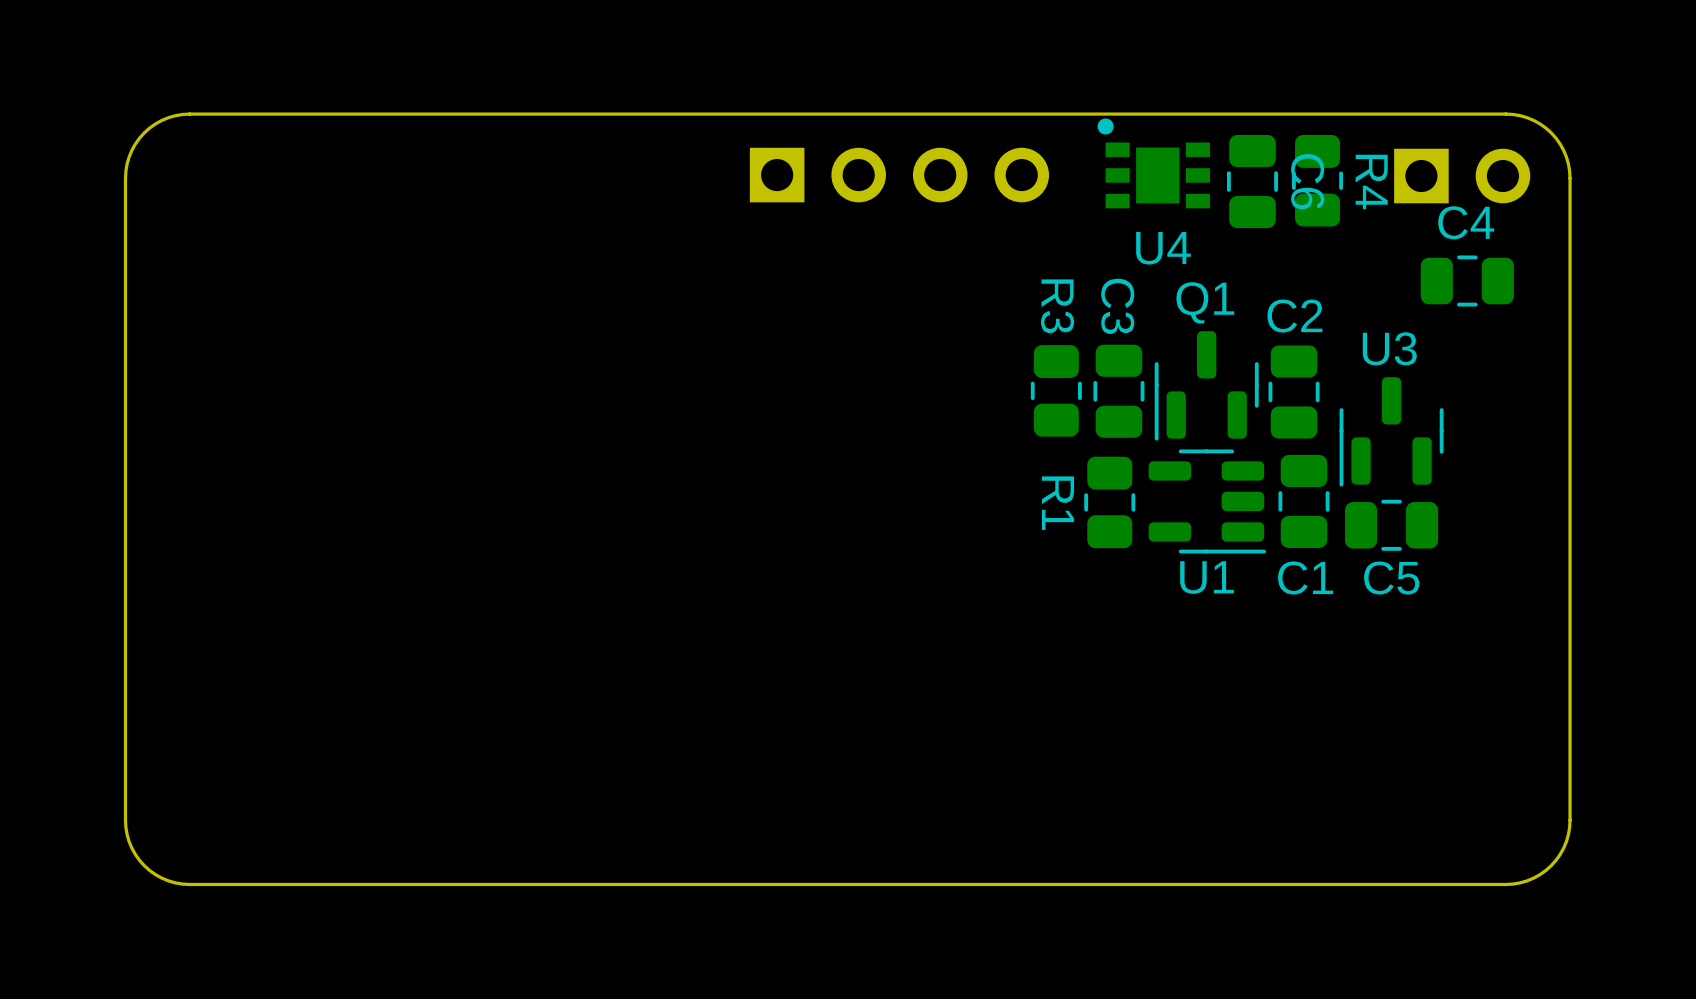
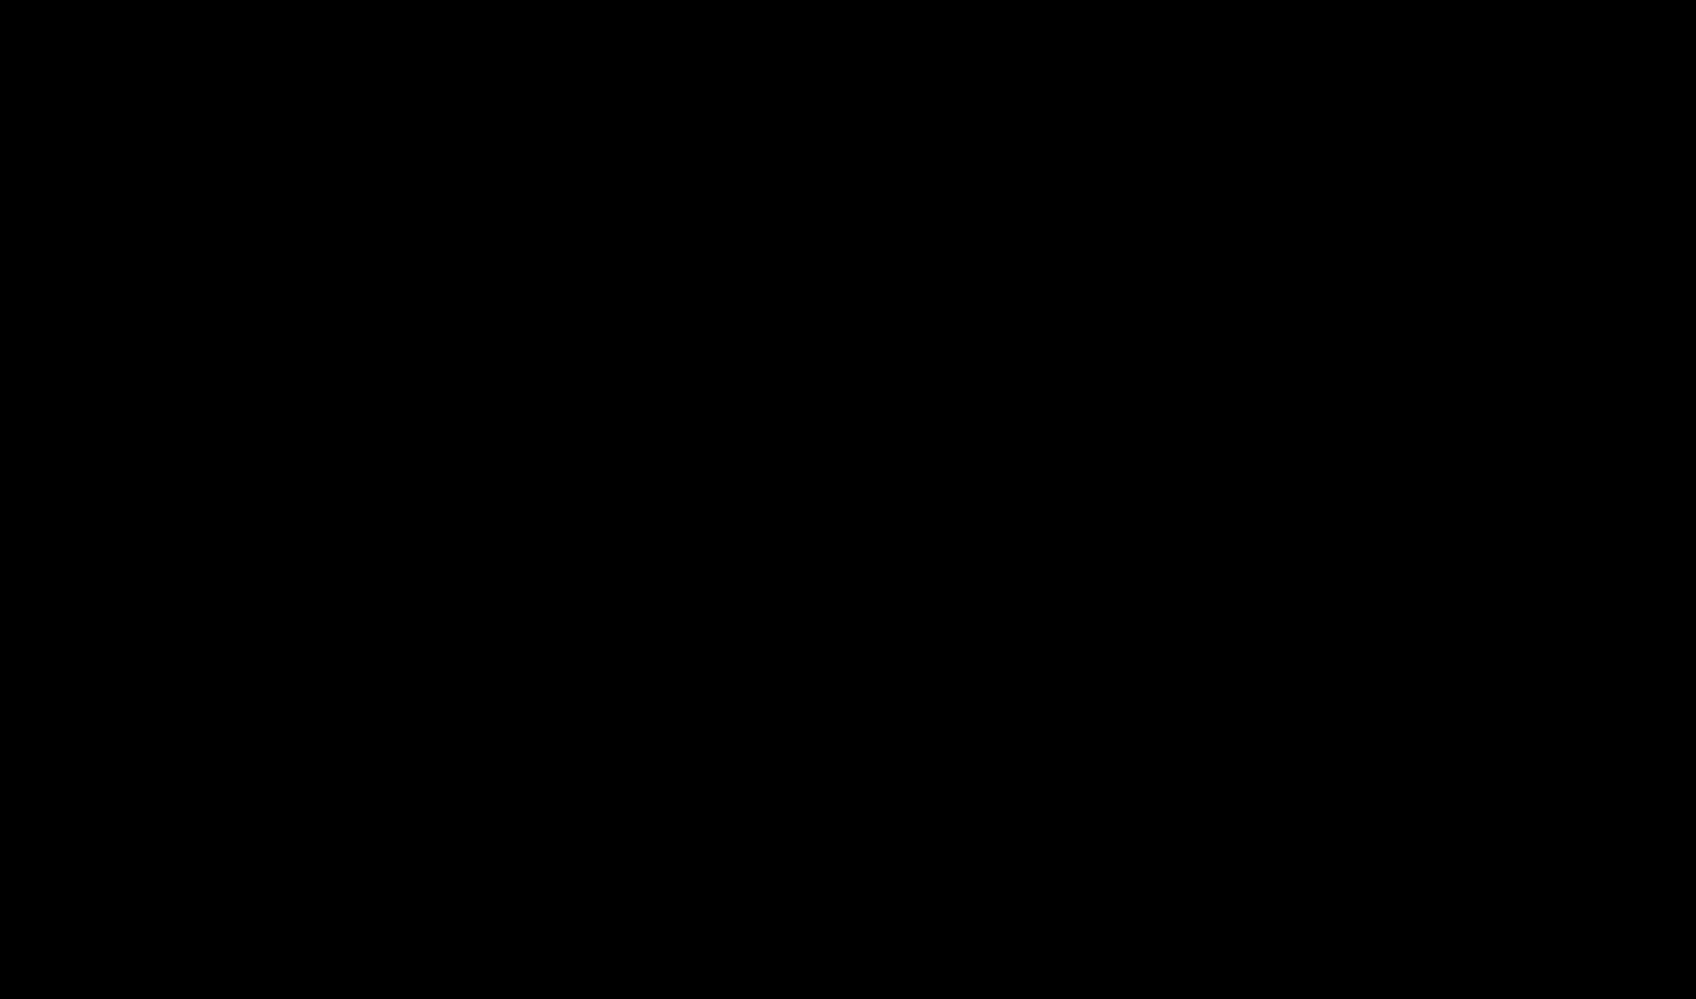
board edge: (1505, 114) (189, 114) (175, 115) (161, 120) (149, 128) (135, 144) (129, 157) (125, 178) (125, 820) (127, 834) (131, 848) (139, 860) (155, 874) (175, 882) (189, 884) (1505, 884) (1520, 882) (1533, 878) (1551, 865) (1560, 854) (1568, 834) (1570, 820) (1570, 178) (1568, 163) (1563, 150) (1551, 132) (1533, 120) (1520, 115) (1505, 114) -> none
U4: (1153, 163) -> none
part: (899, 175) -> none
part: (1462, 176) -> none
R4: (1317, 180) -> none
C6: (1252, 181) -> none
C4: (1467, 280) -> none
Q1: (1206, 385) -> none
R3: (1056, 390) -> none
C3: (1118, 391) -> none
C2: (1294, 391) -> none
U3: (1391, 431) -> none
U1: (1207, 501) -> none
C1: (1303, 501) -> none
R1: (1109, 502) -> none
C5: (1391, 525) -> none

